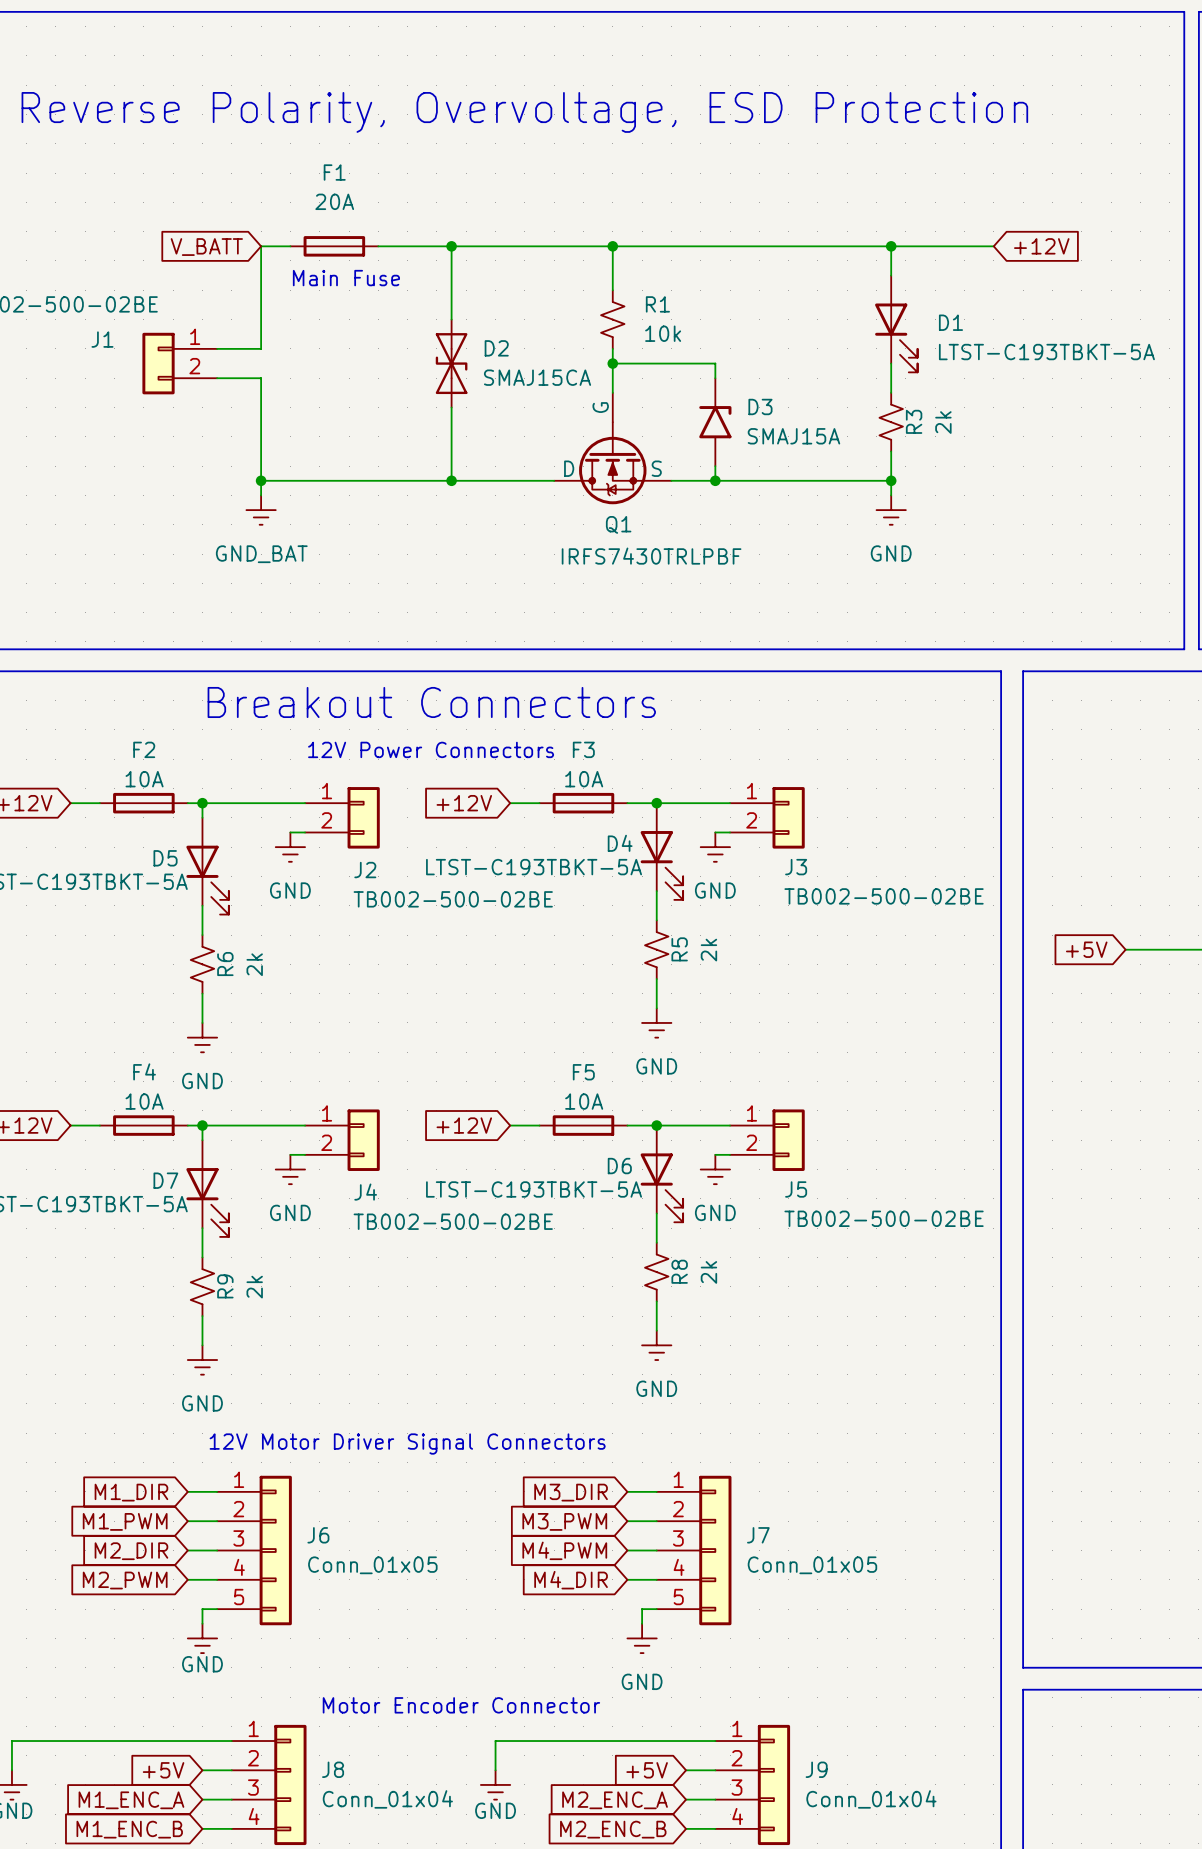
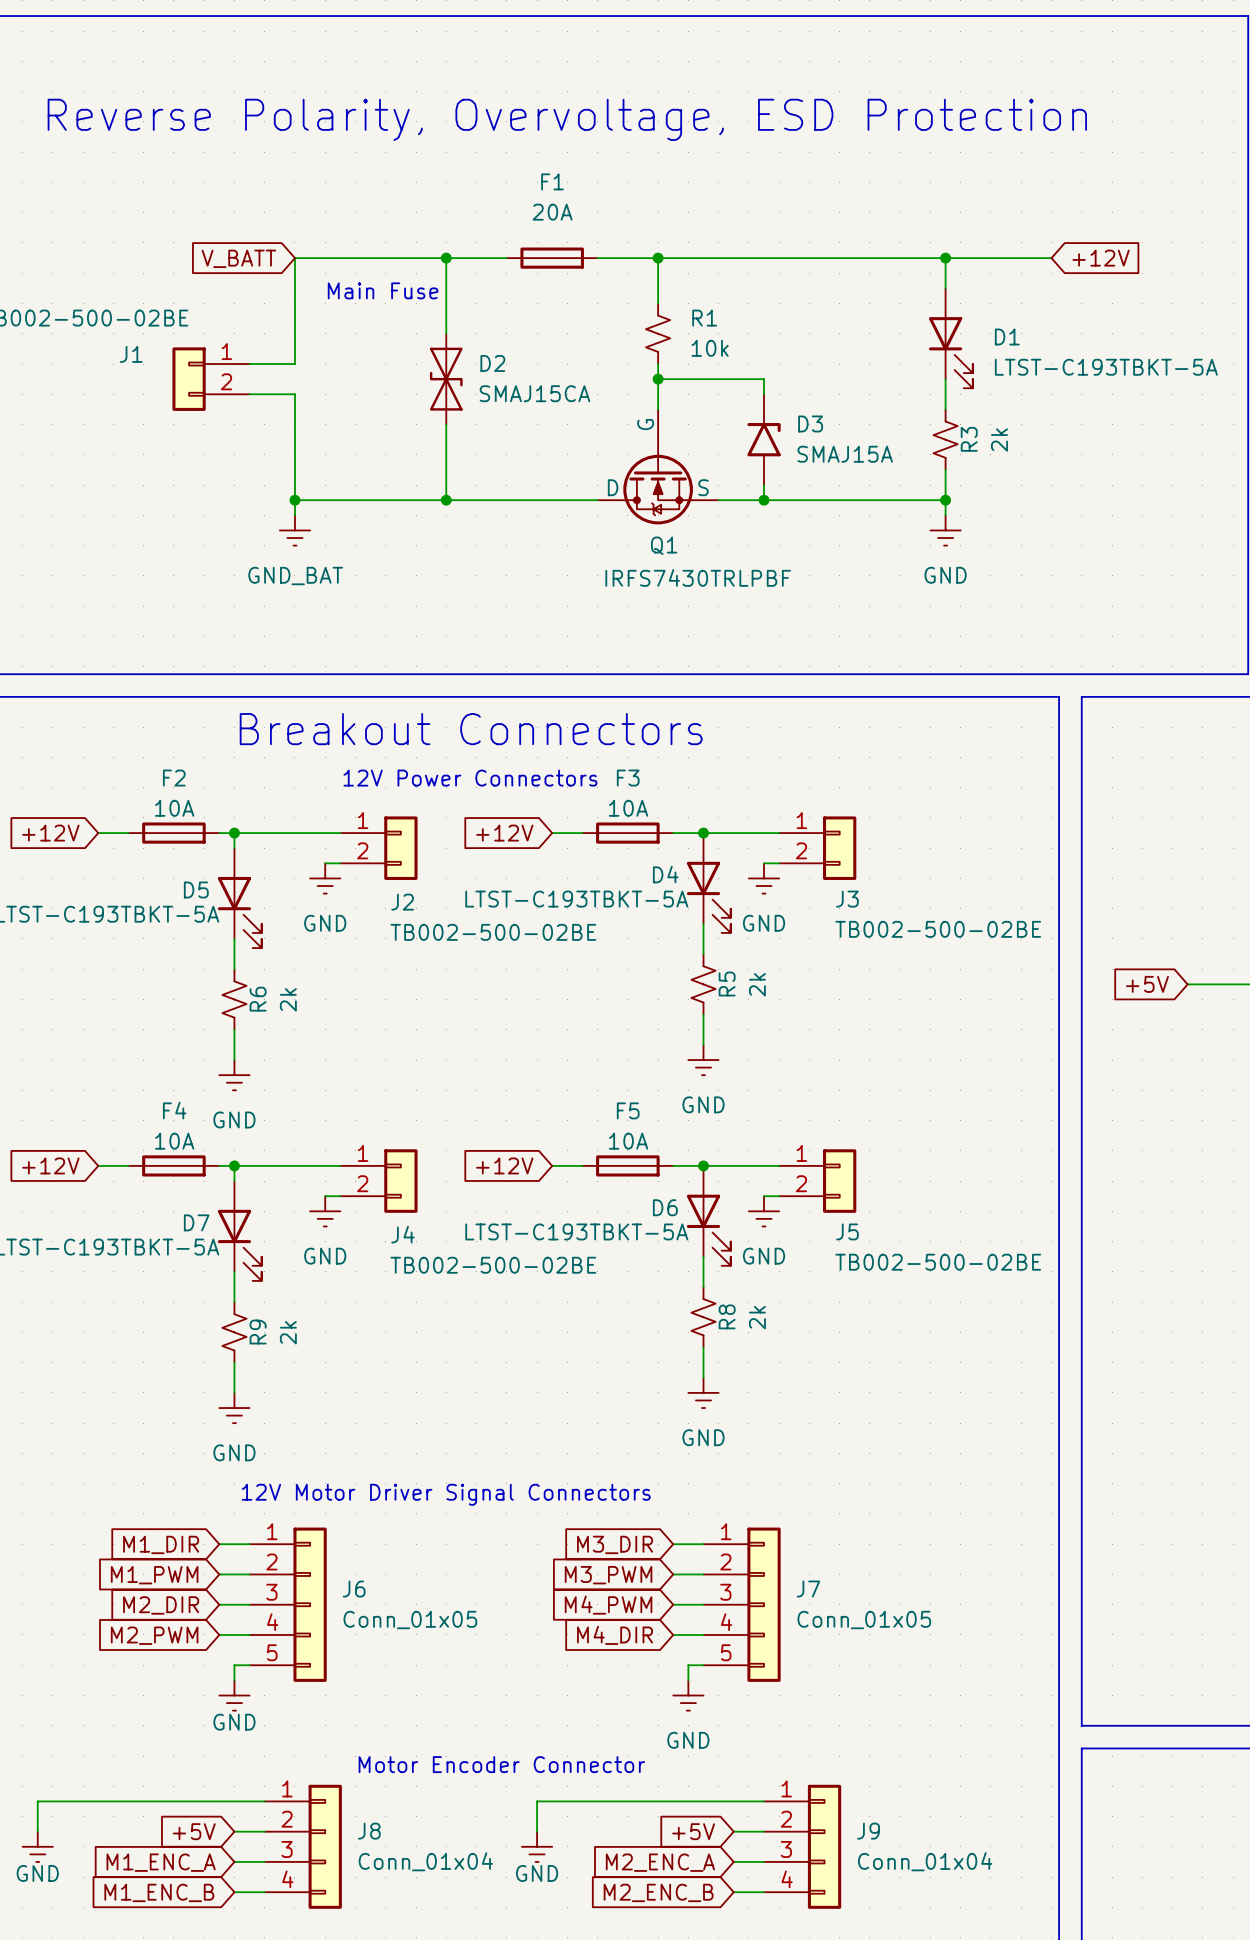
F1 position: (334, 246) -> (552, 258)
wire: (451, 246) (451, 319) -> (446, 258) (446, 333)
junction position: (451, 246) -> (446, 258)
D2 position: (451, 363) -> (446, 379)
wire: (451, 407) (451, 480) -> (446, 424) (446, 500)
junction position: (451, 480) -> (446, 500)

